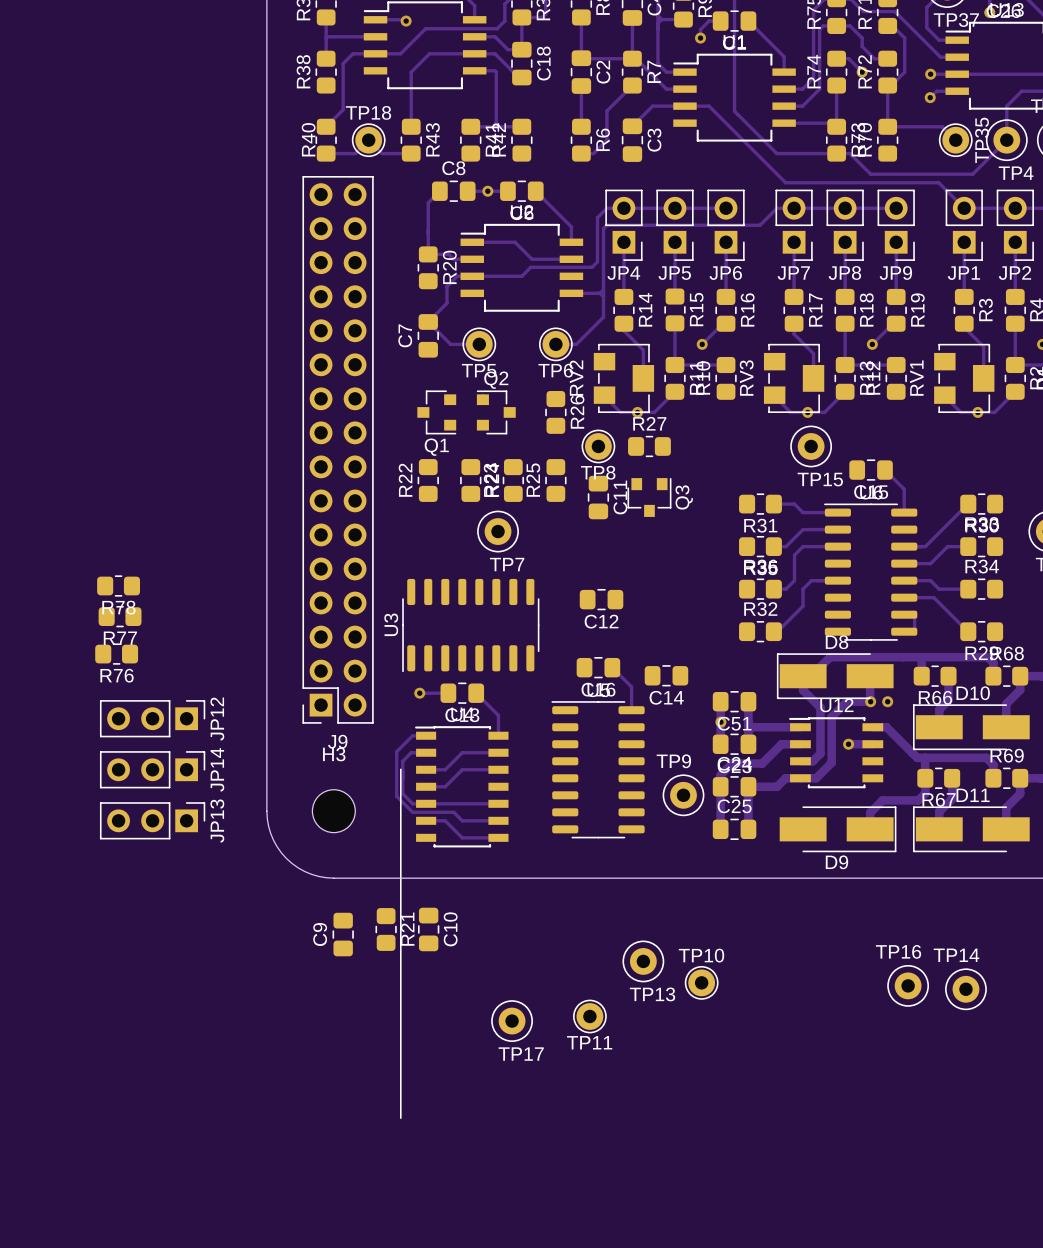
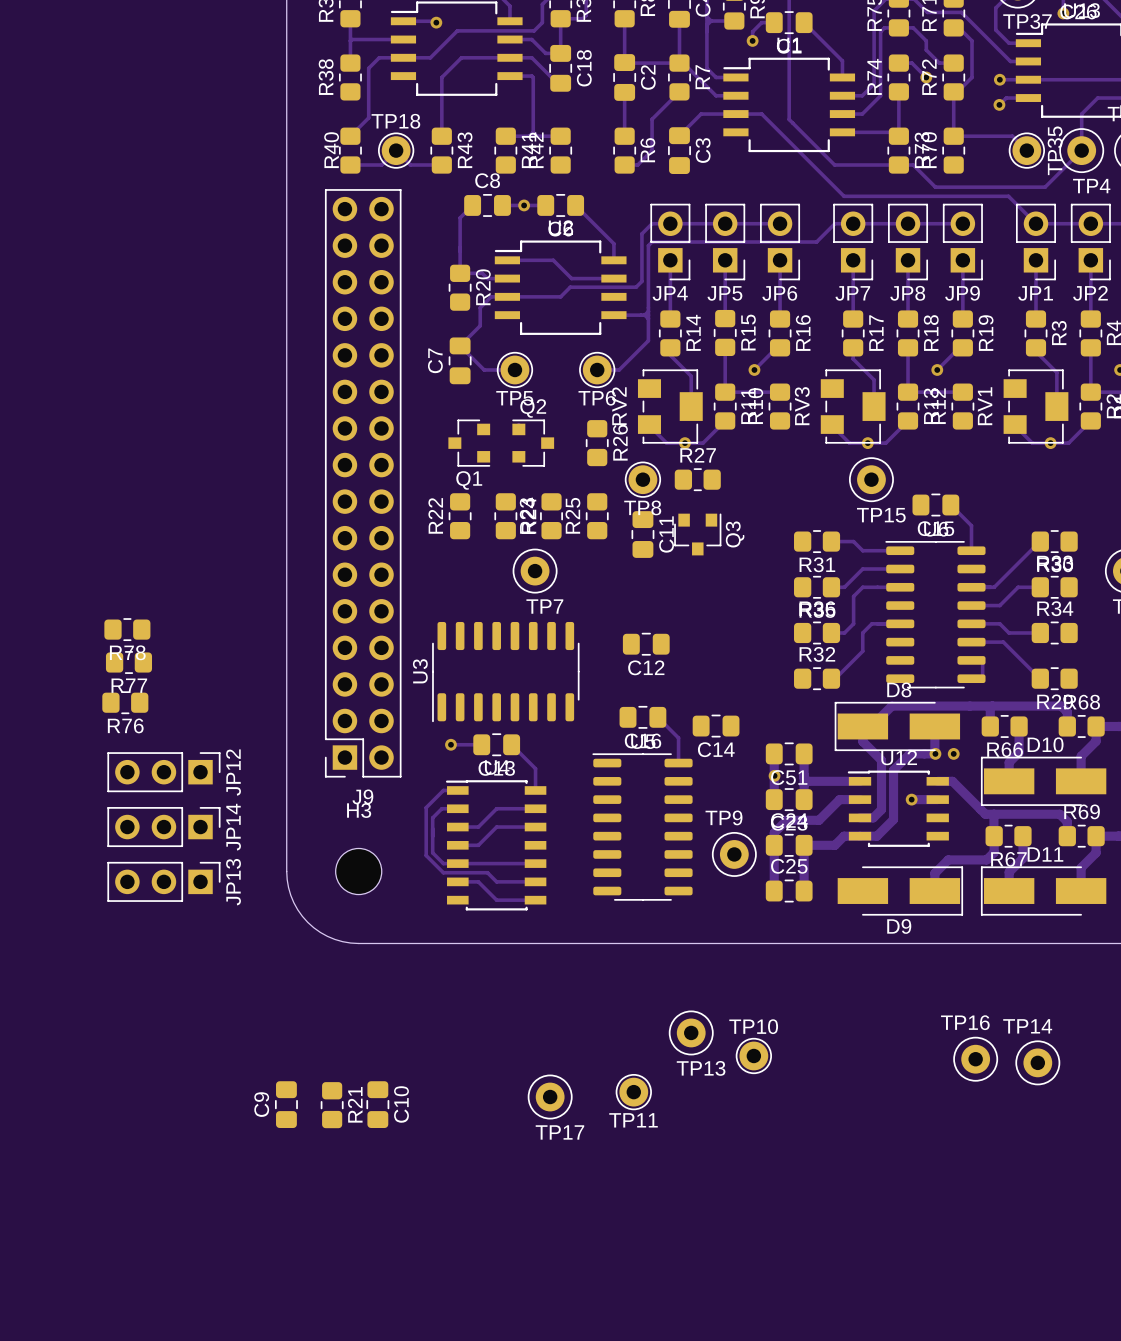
line: (400, 769) (400, 1118) -> none
R21 position: (386, 929) -> (332, 1105)
C10 position: (428, 929) -> (377, 1104)
C9 position: (343, 934) -> (286, 1104)

